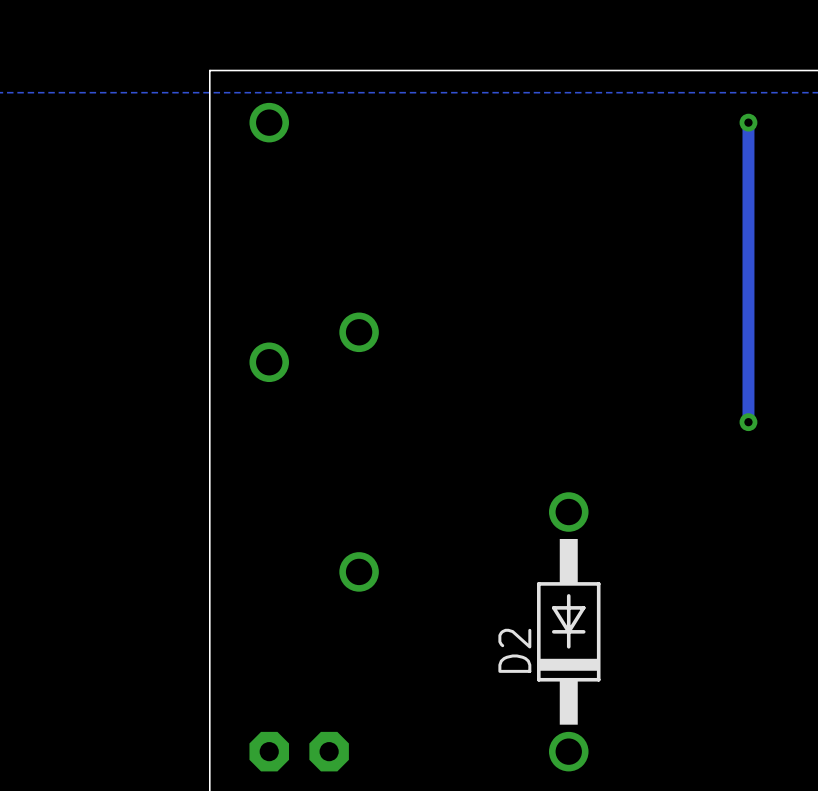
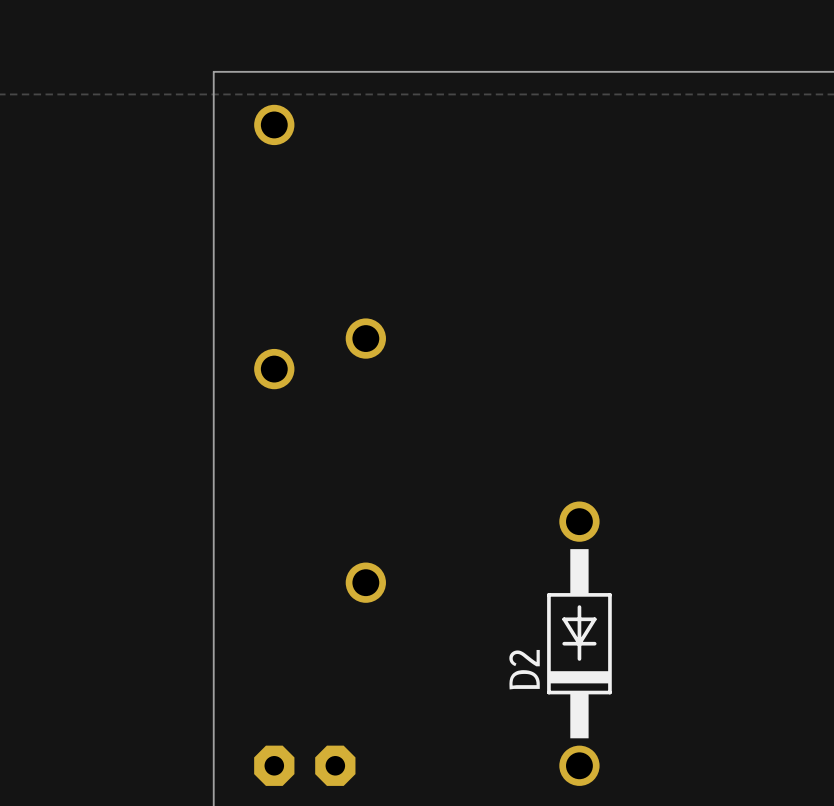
track: (748, 122) (748, 422) -> none
via: (748, 122) -> none
via: (748, 422) -> none

